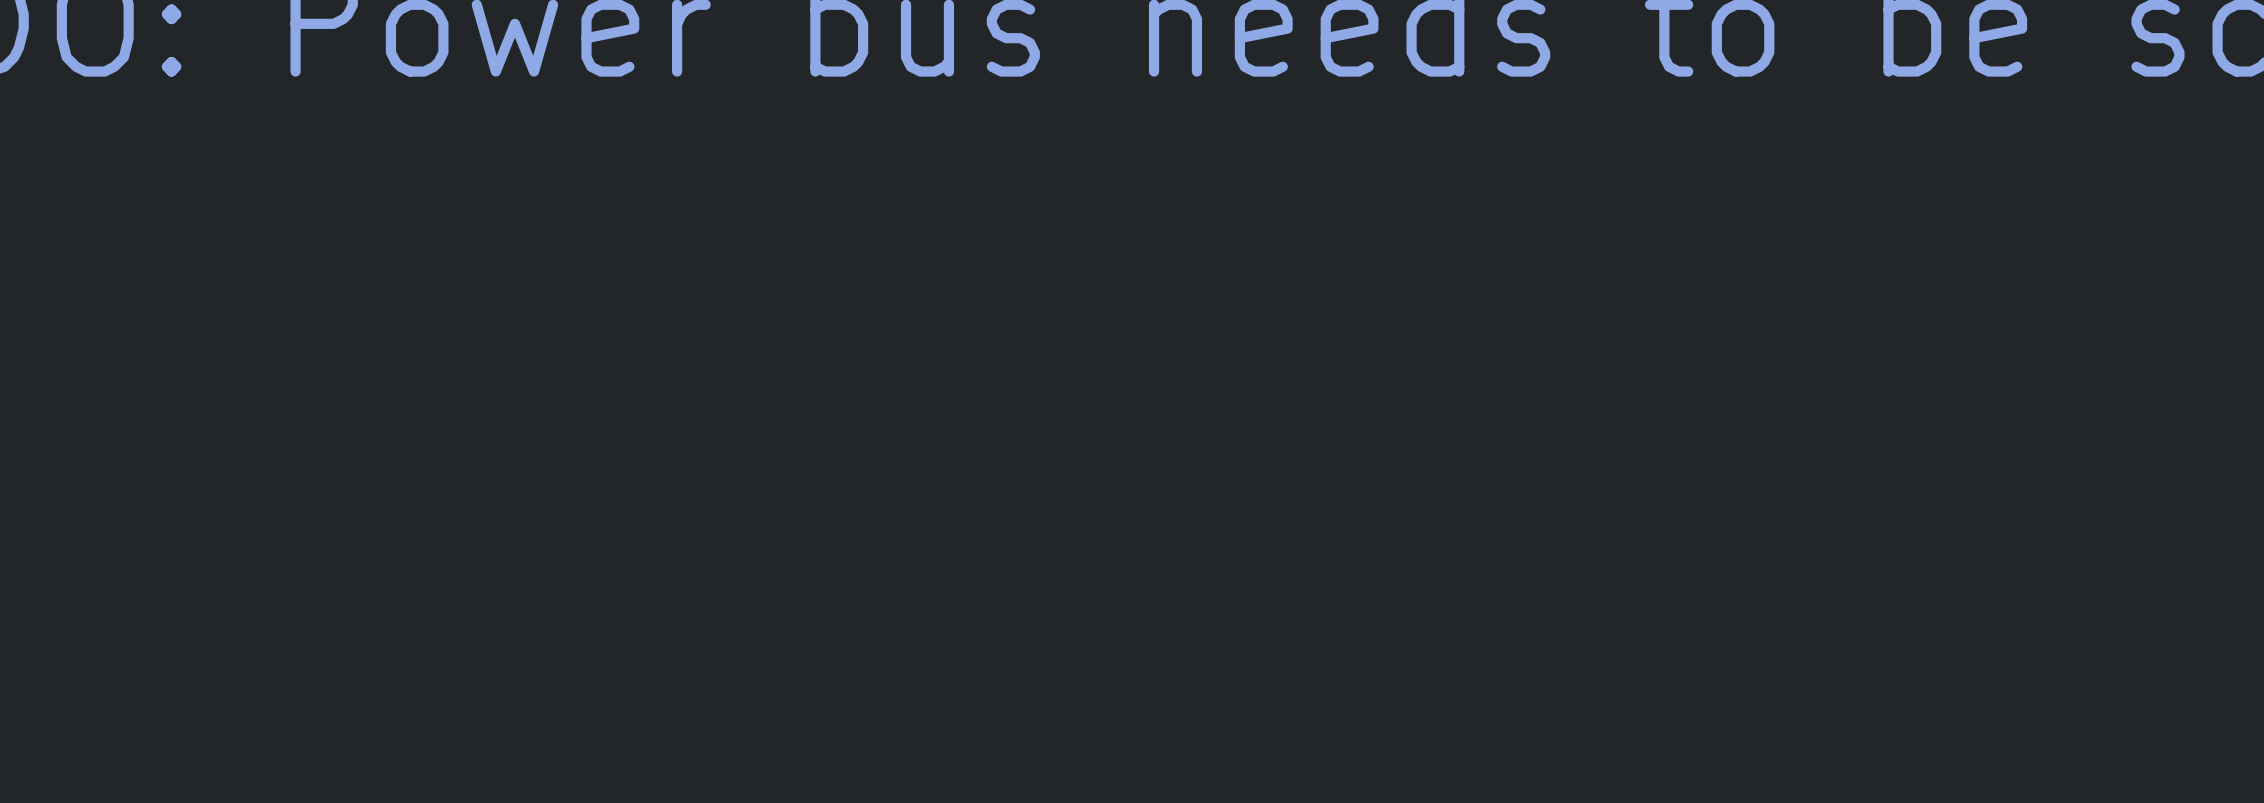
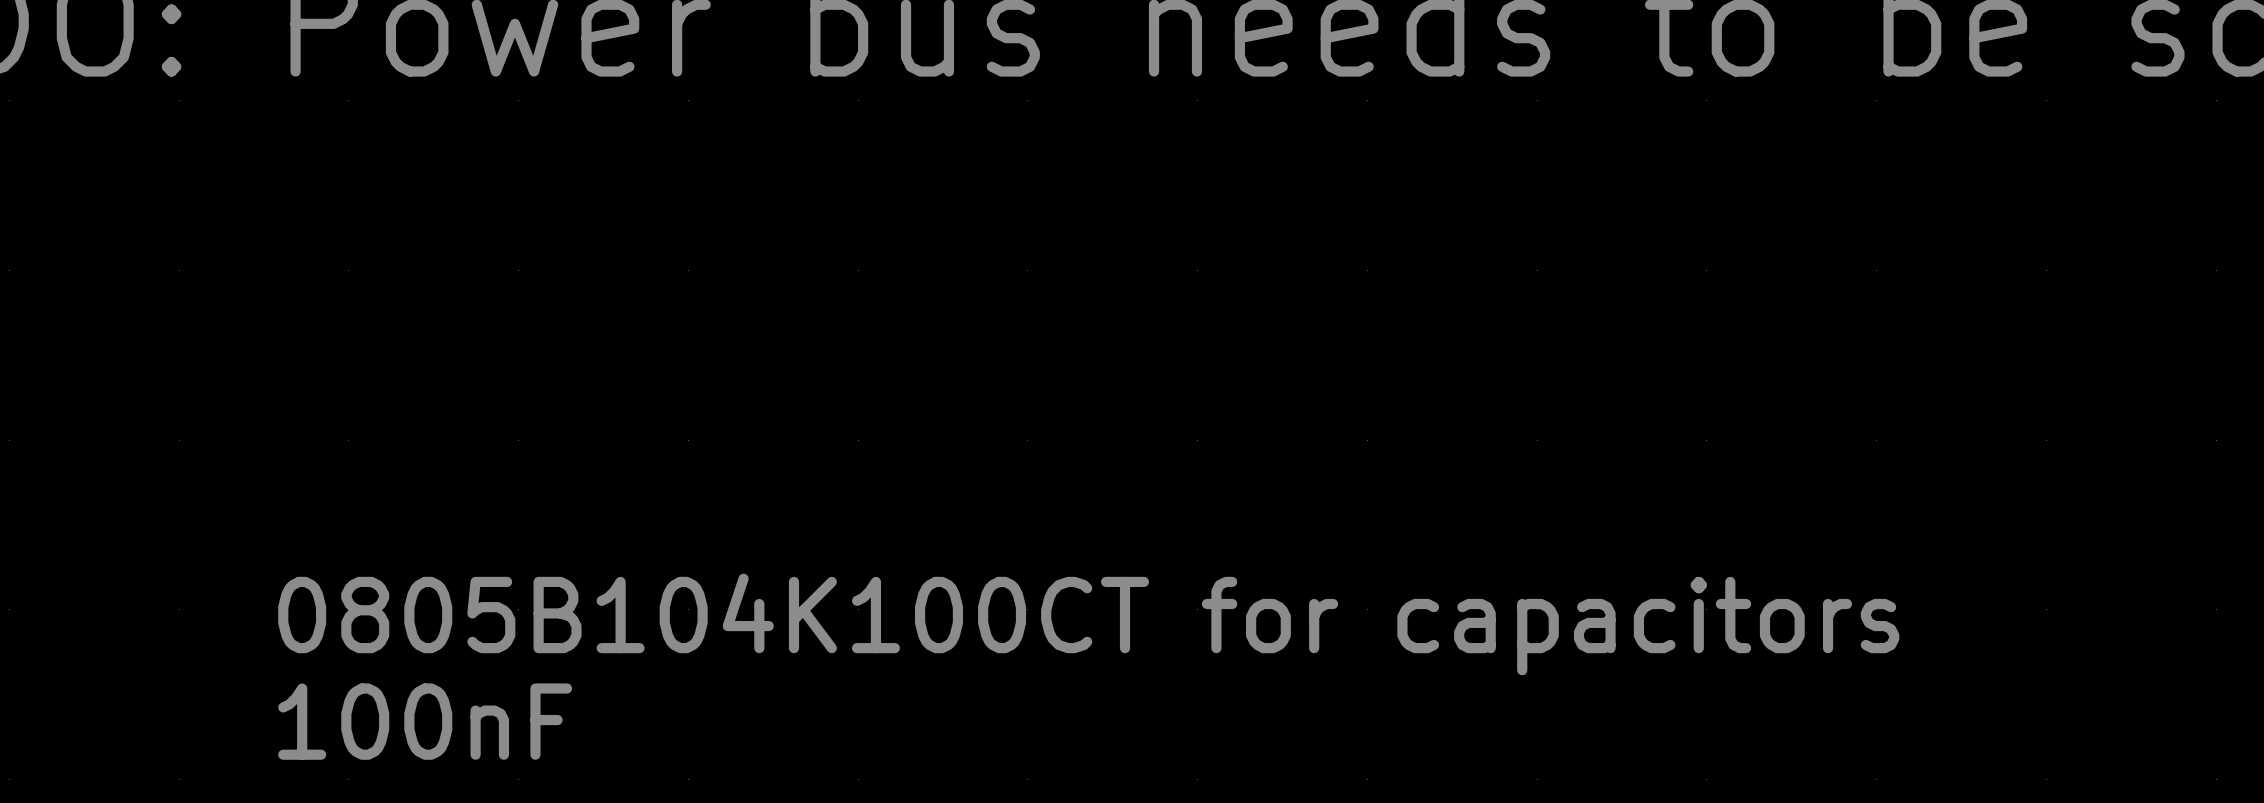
text: none -> 0805B104K100CT for capacitors (1088, 624)
text: none -> 100nF (425, 721)

